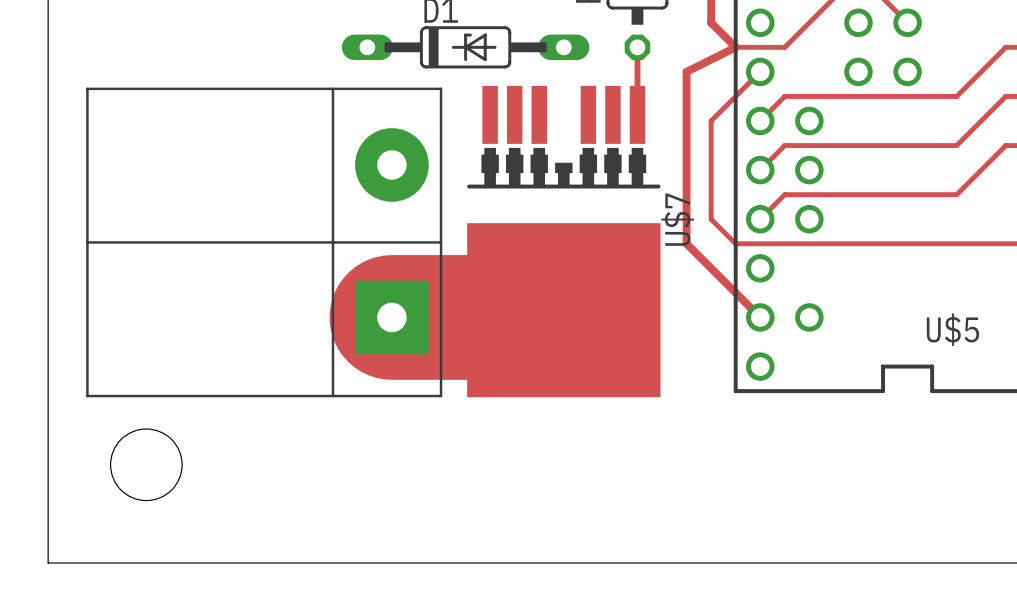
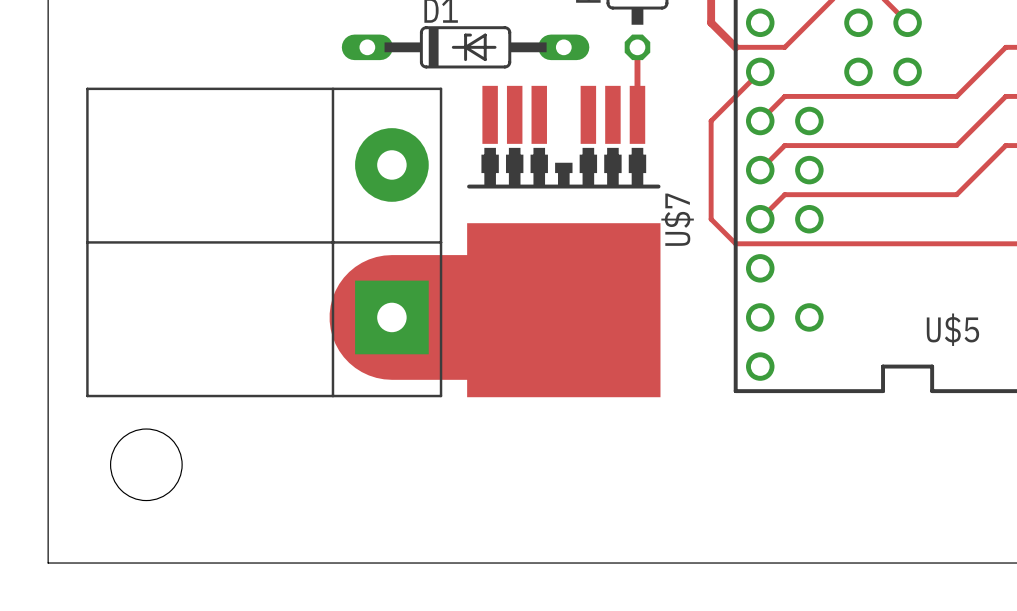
track: (735, 47) (686, 71) (686, 243) (760, 317) -> none

